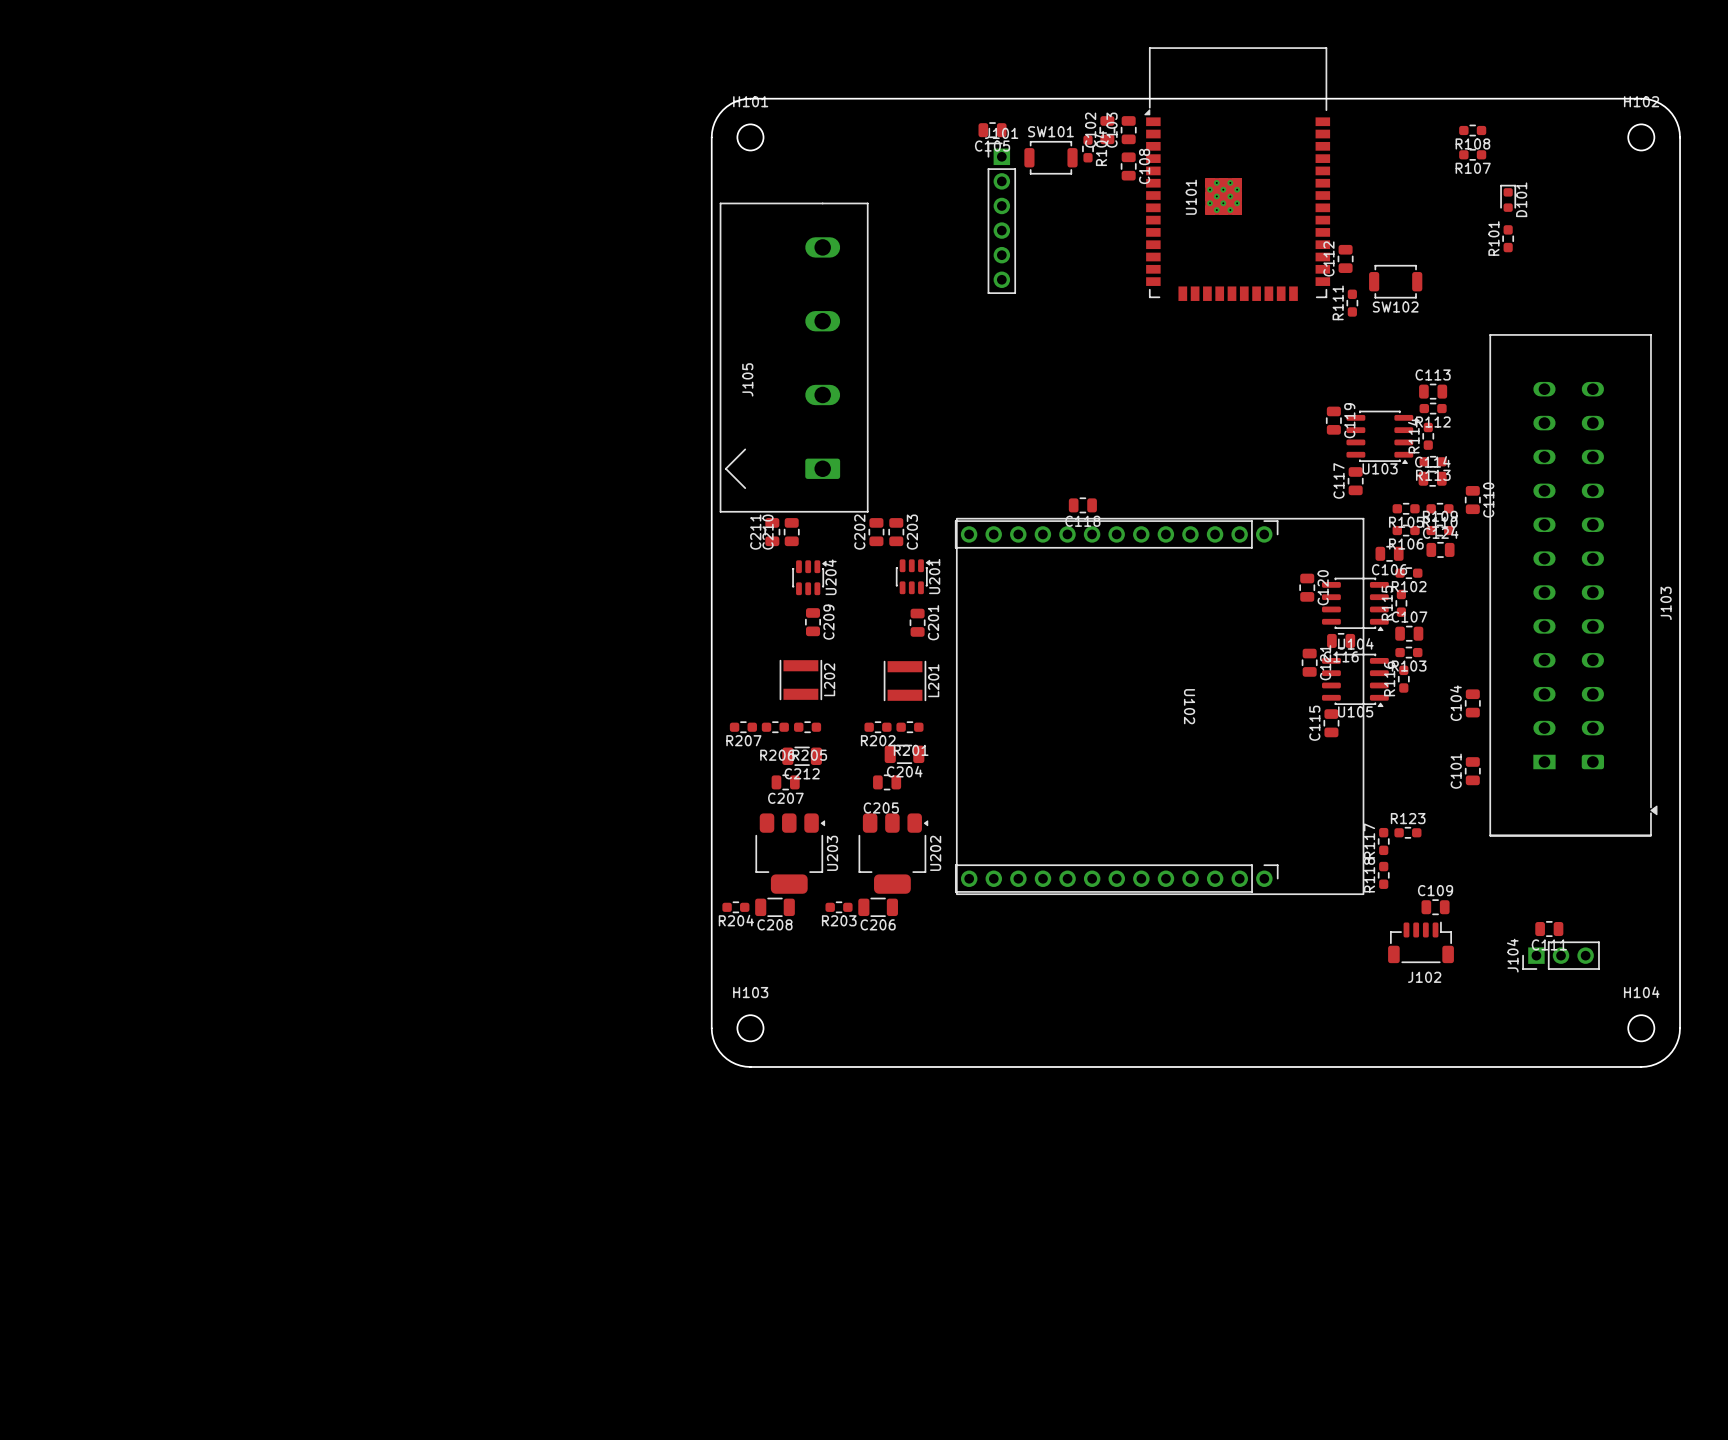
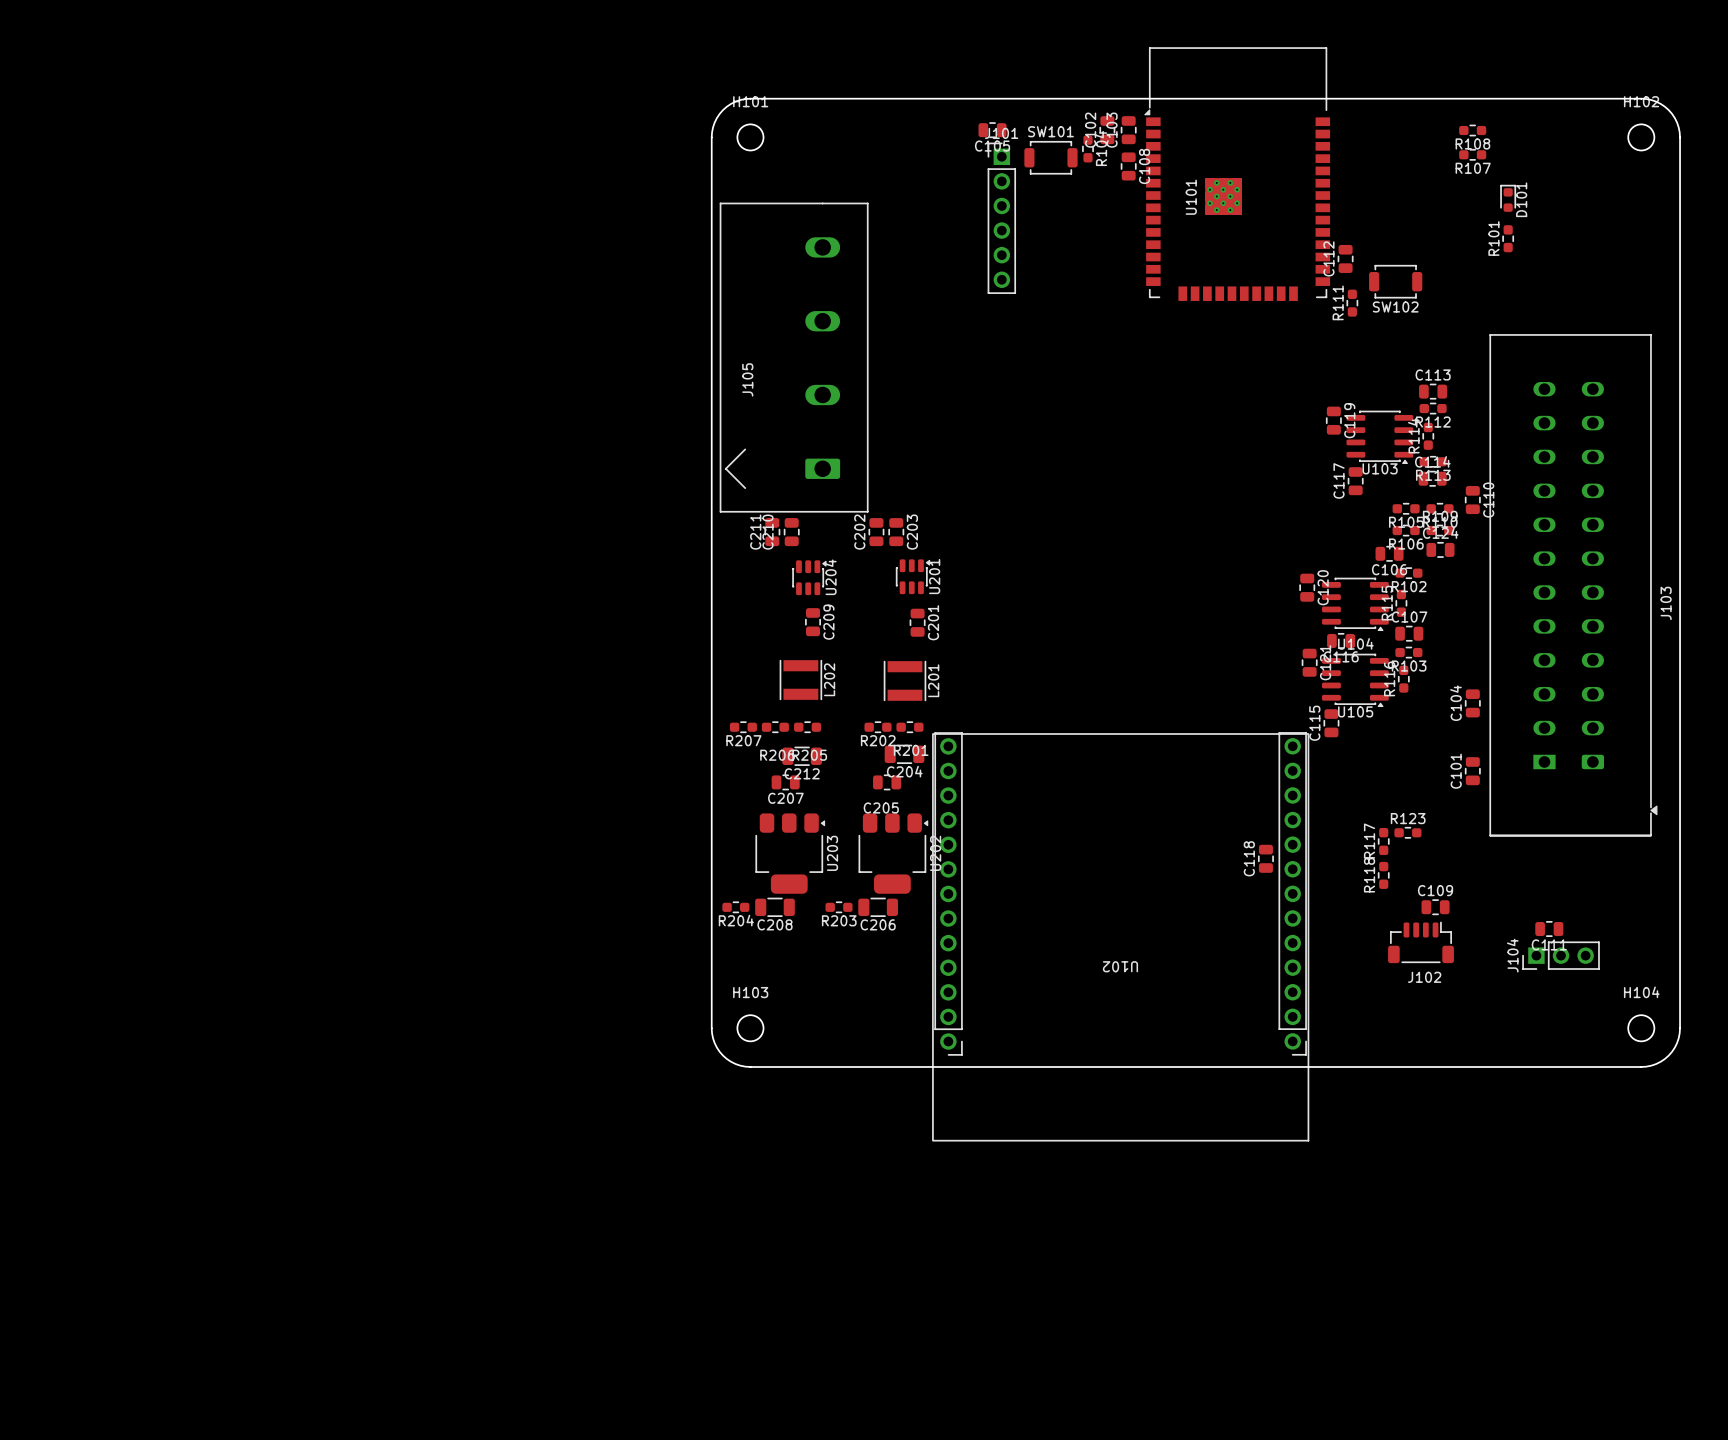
C118 rotation: 0° (1082, 505) -> 90° clockwise (1265, 858)
C118 position: (1082, 505) -> (1265, 858)
U102 rotation: 0° (1159, 706) -> 90° clockwise (1120, 936)

